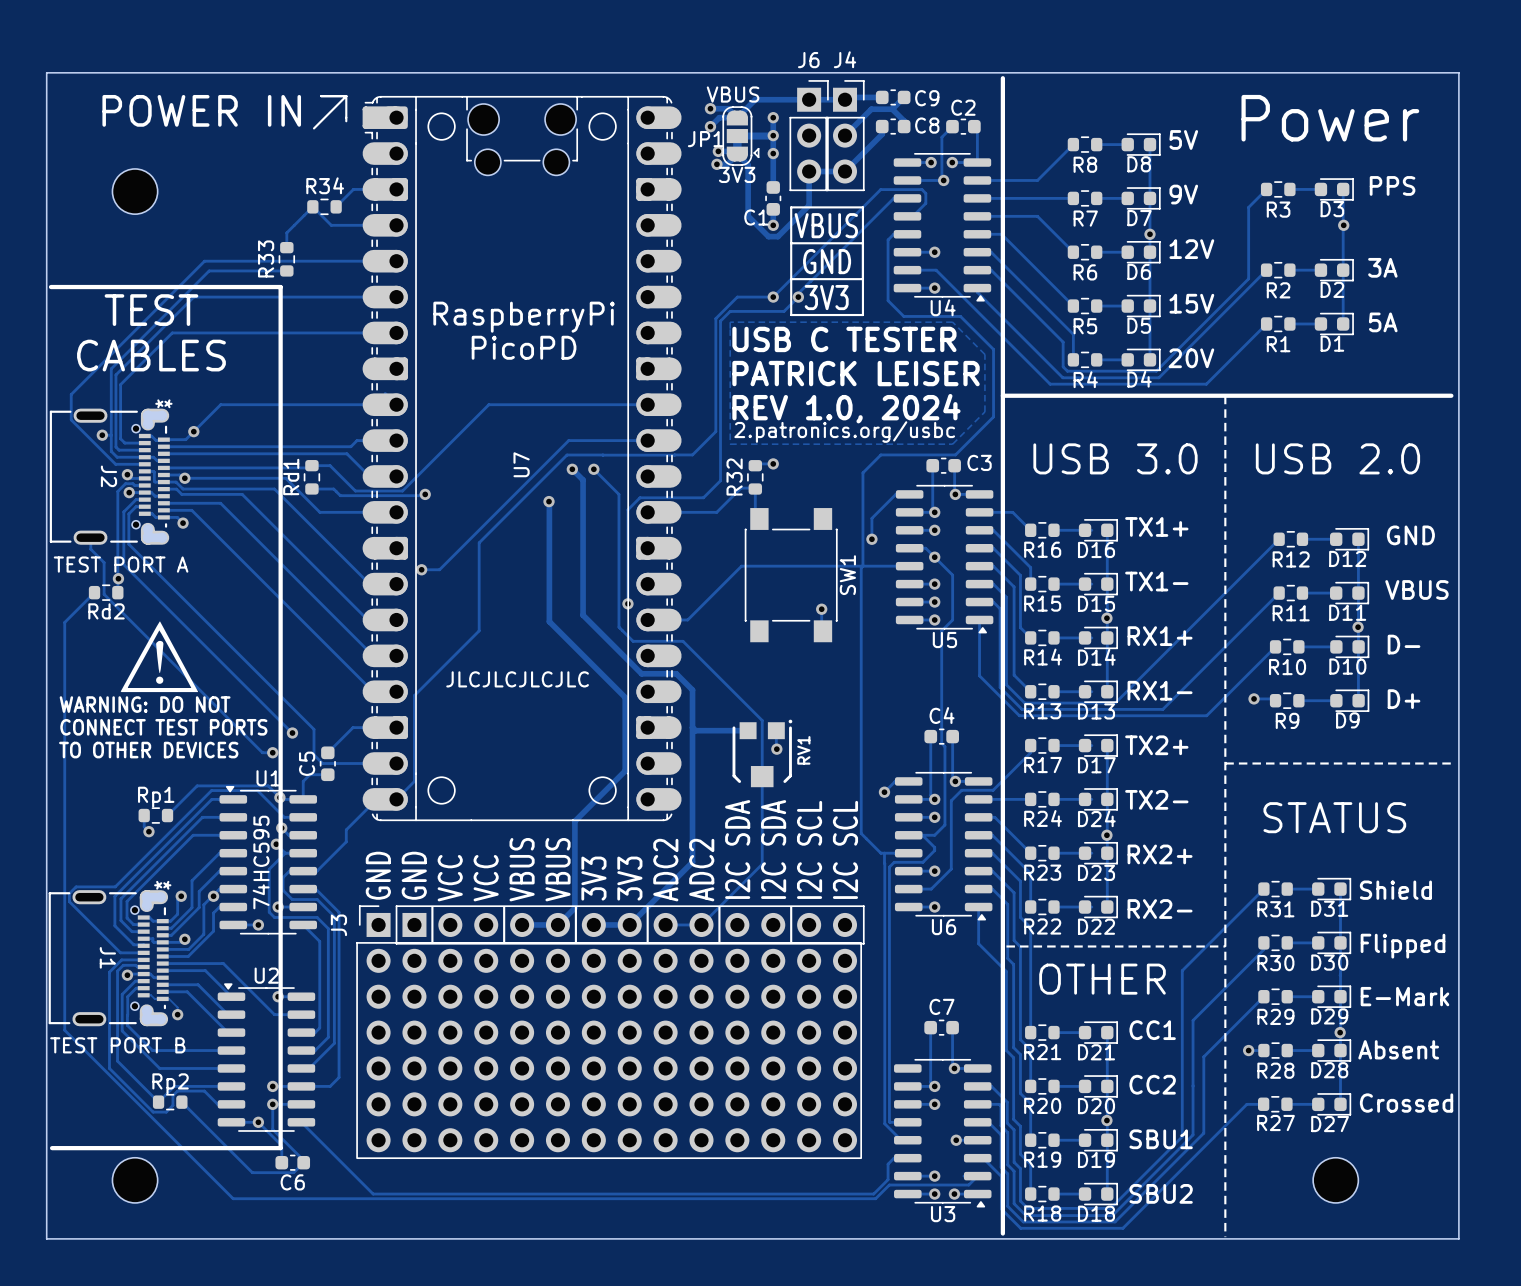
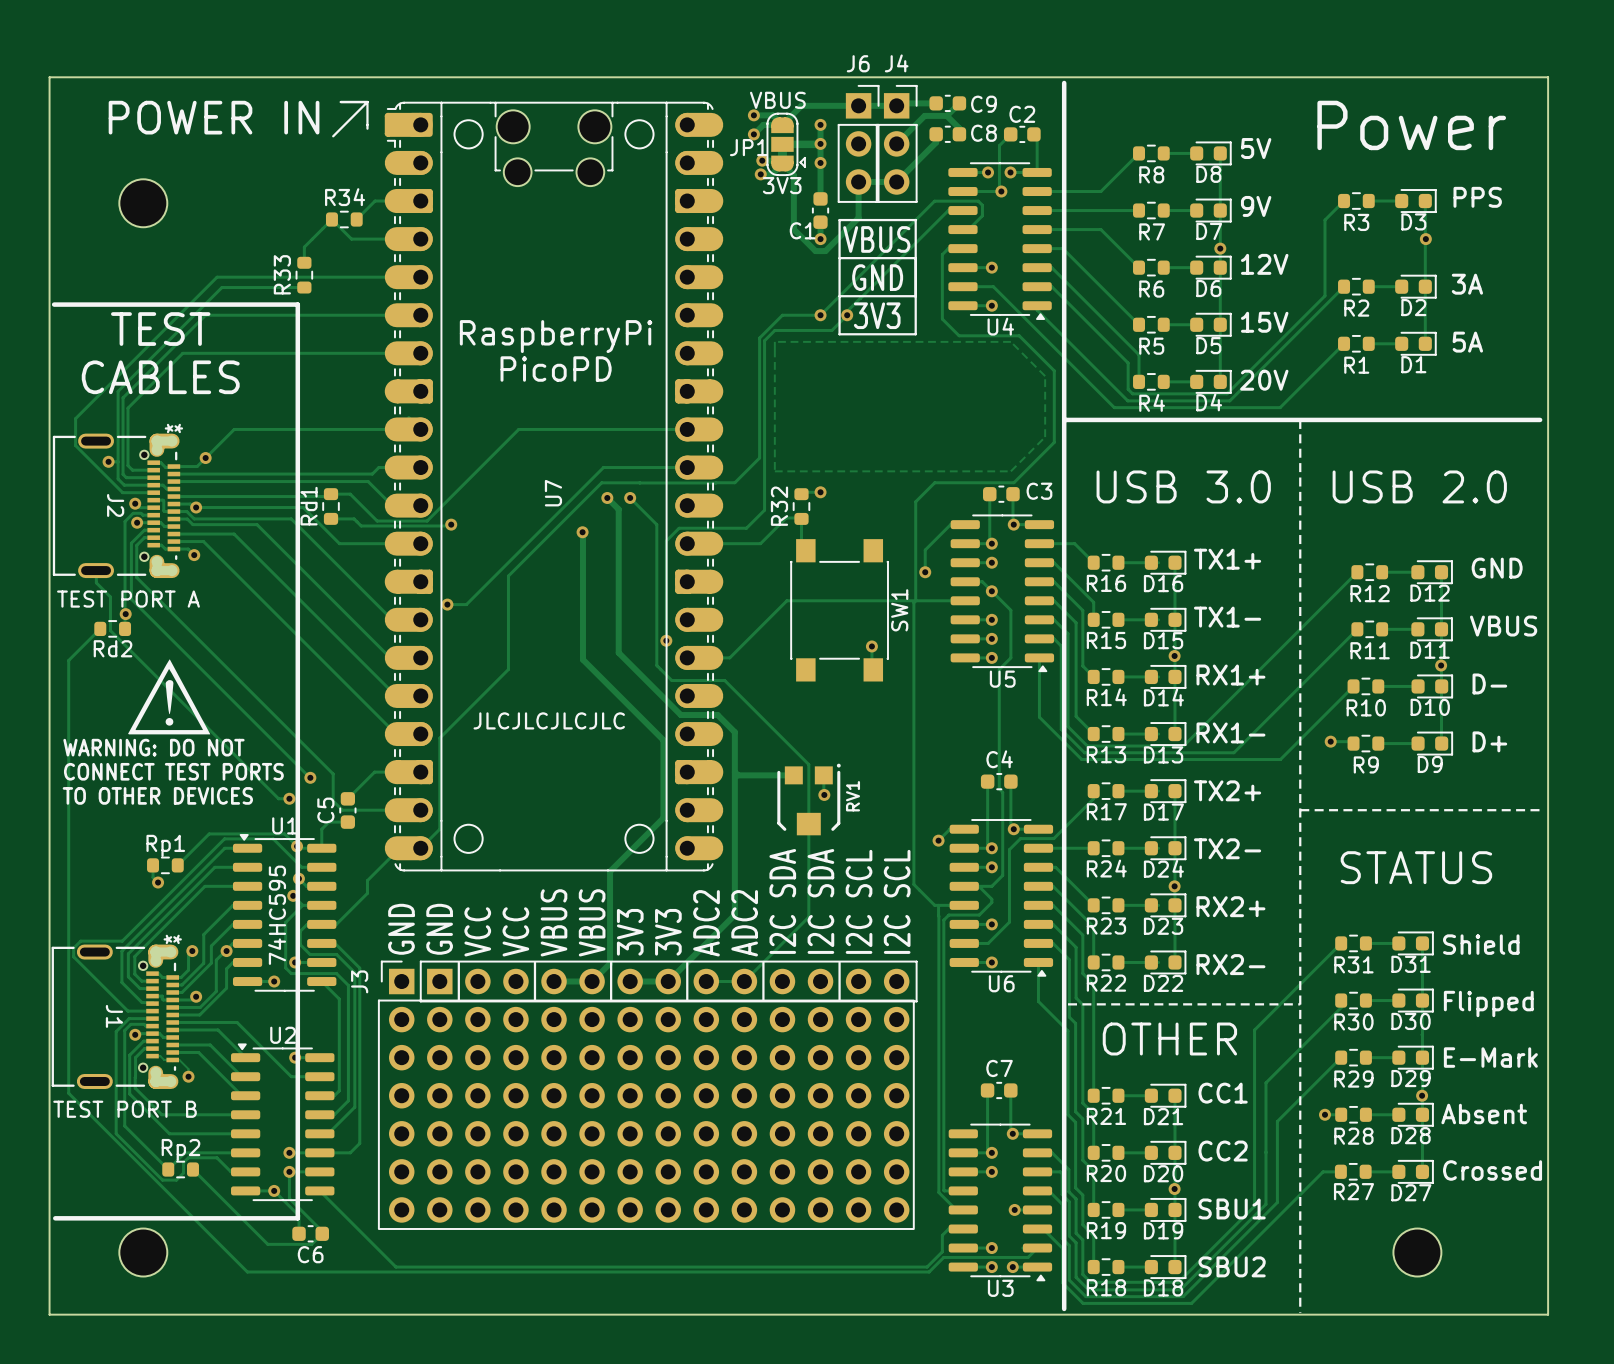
text: USB C TESTER (844, 339) -> none
text: PATRICK LEISER (856, 373) -> none
text: REV 1.0, 2024 (846, 408) -> none
text: 2.patronics.org/usbc (844, 432) -> none

